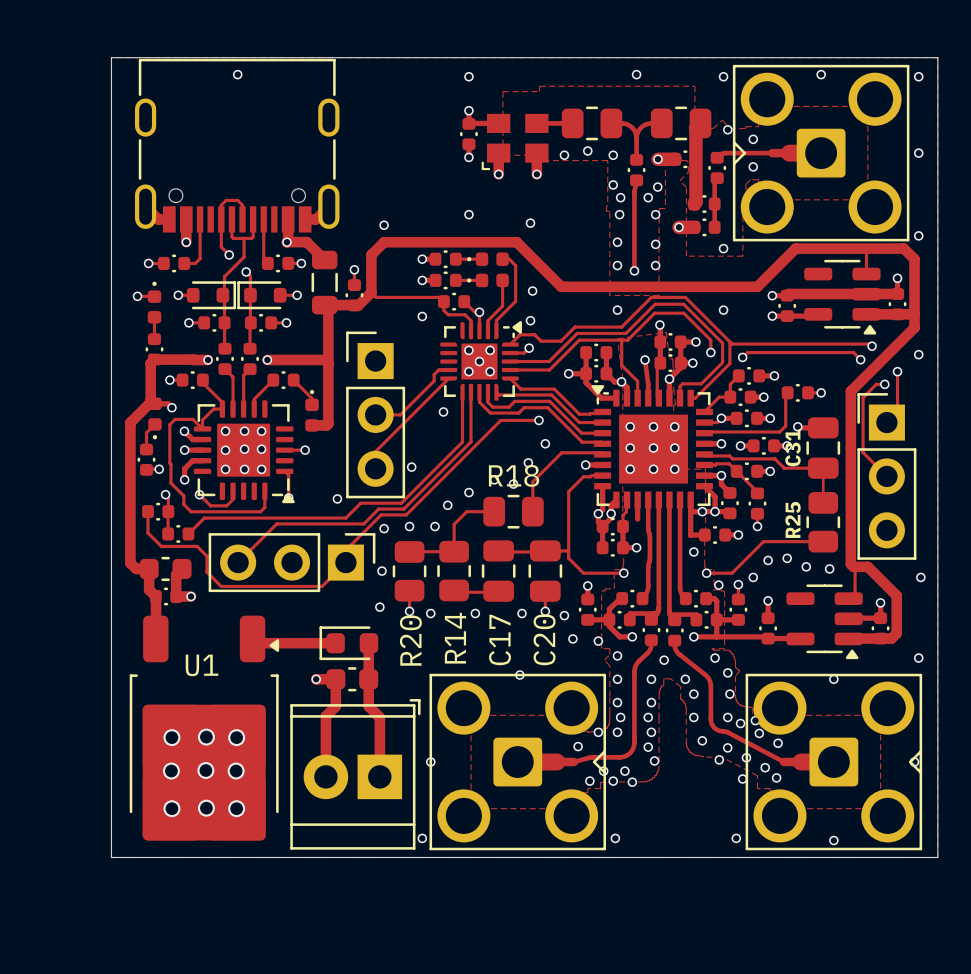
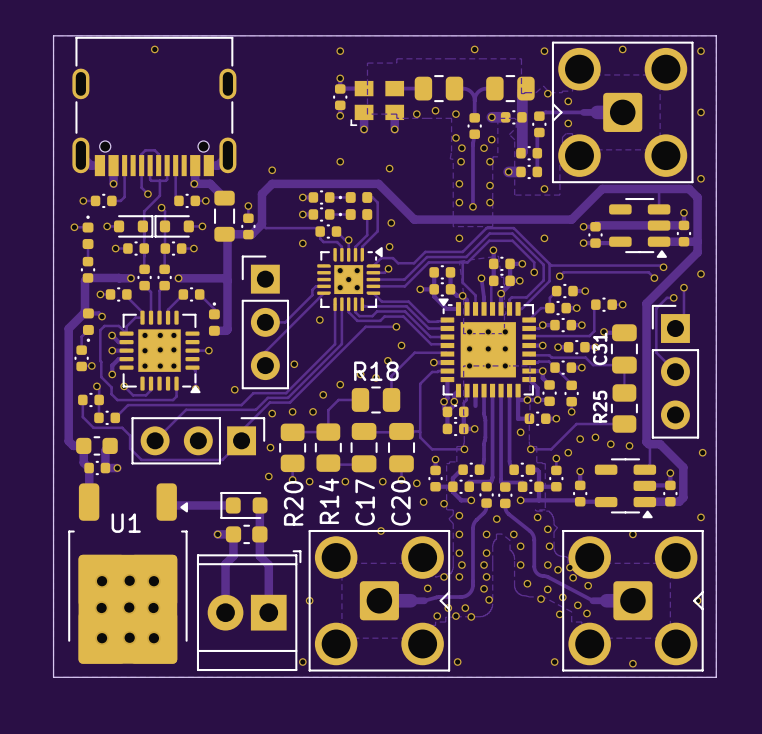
via: (718, 585) -> none

